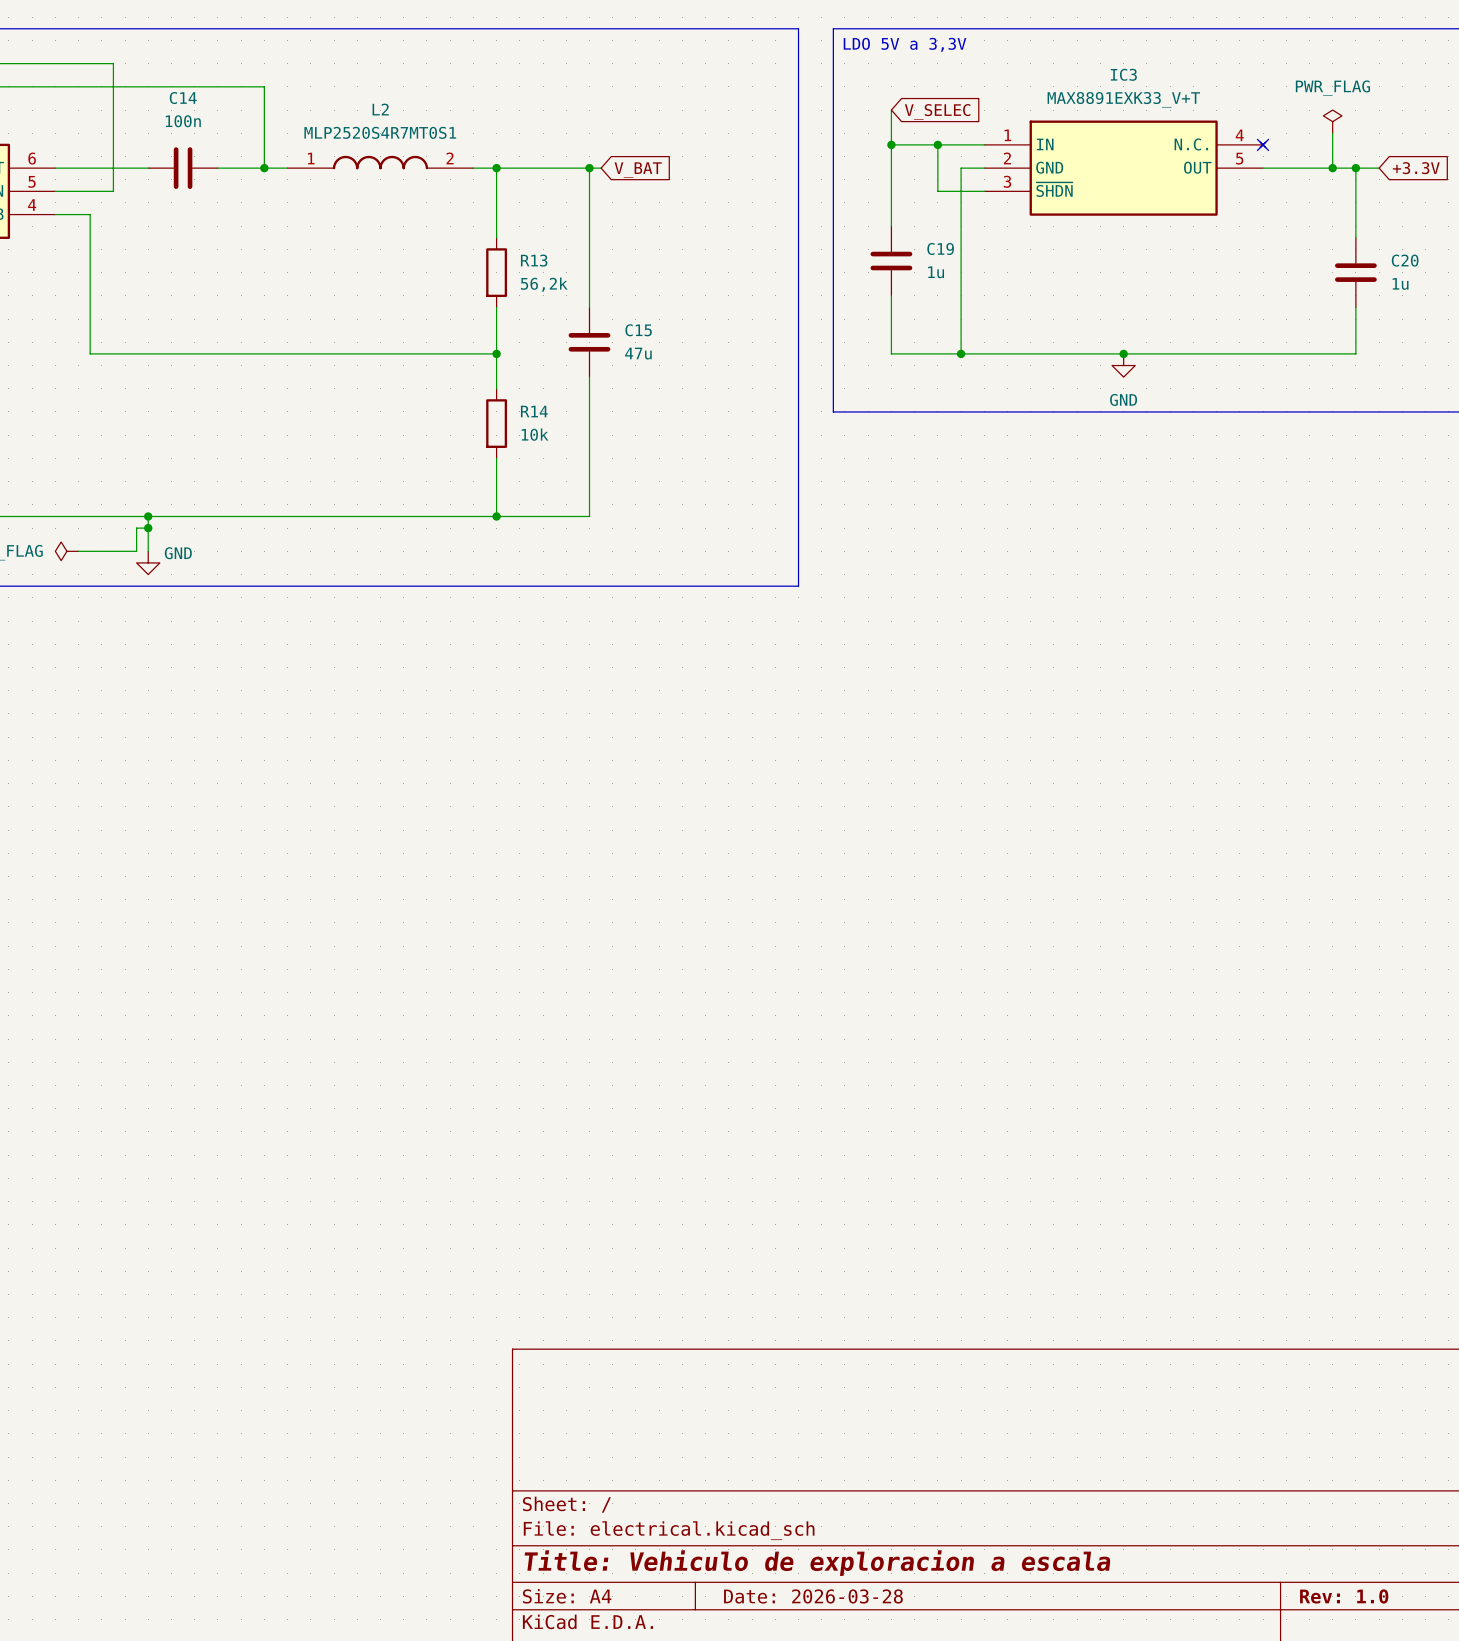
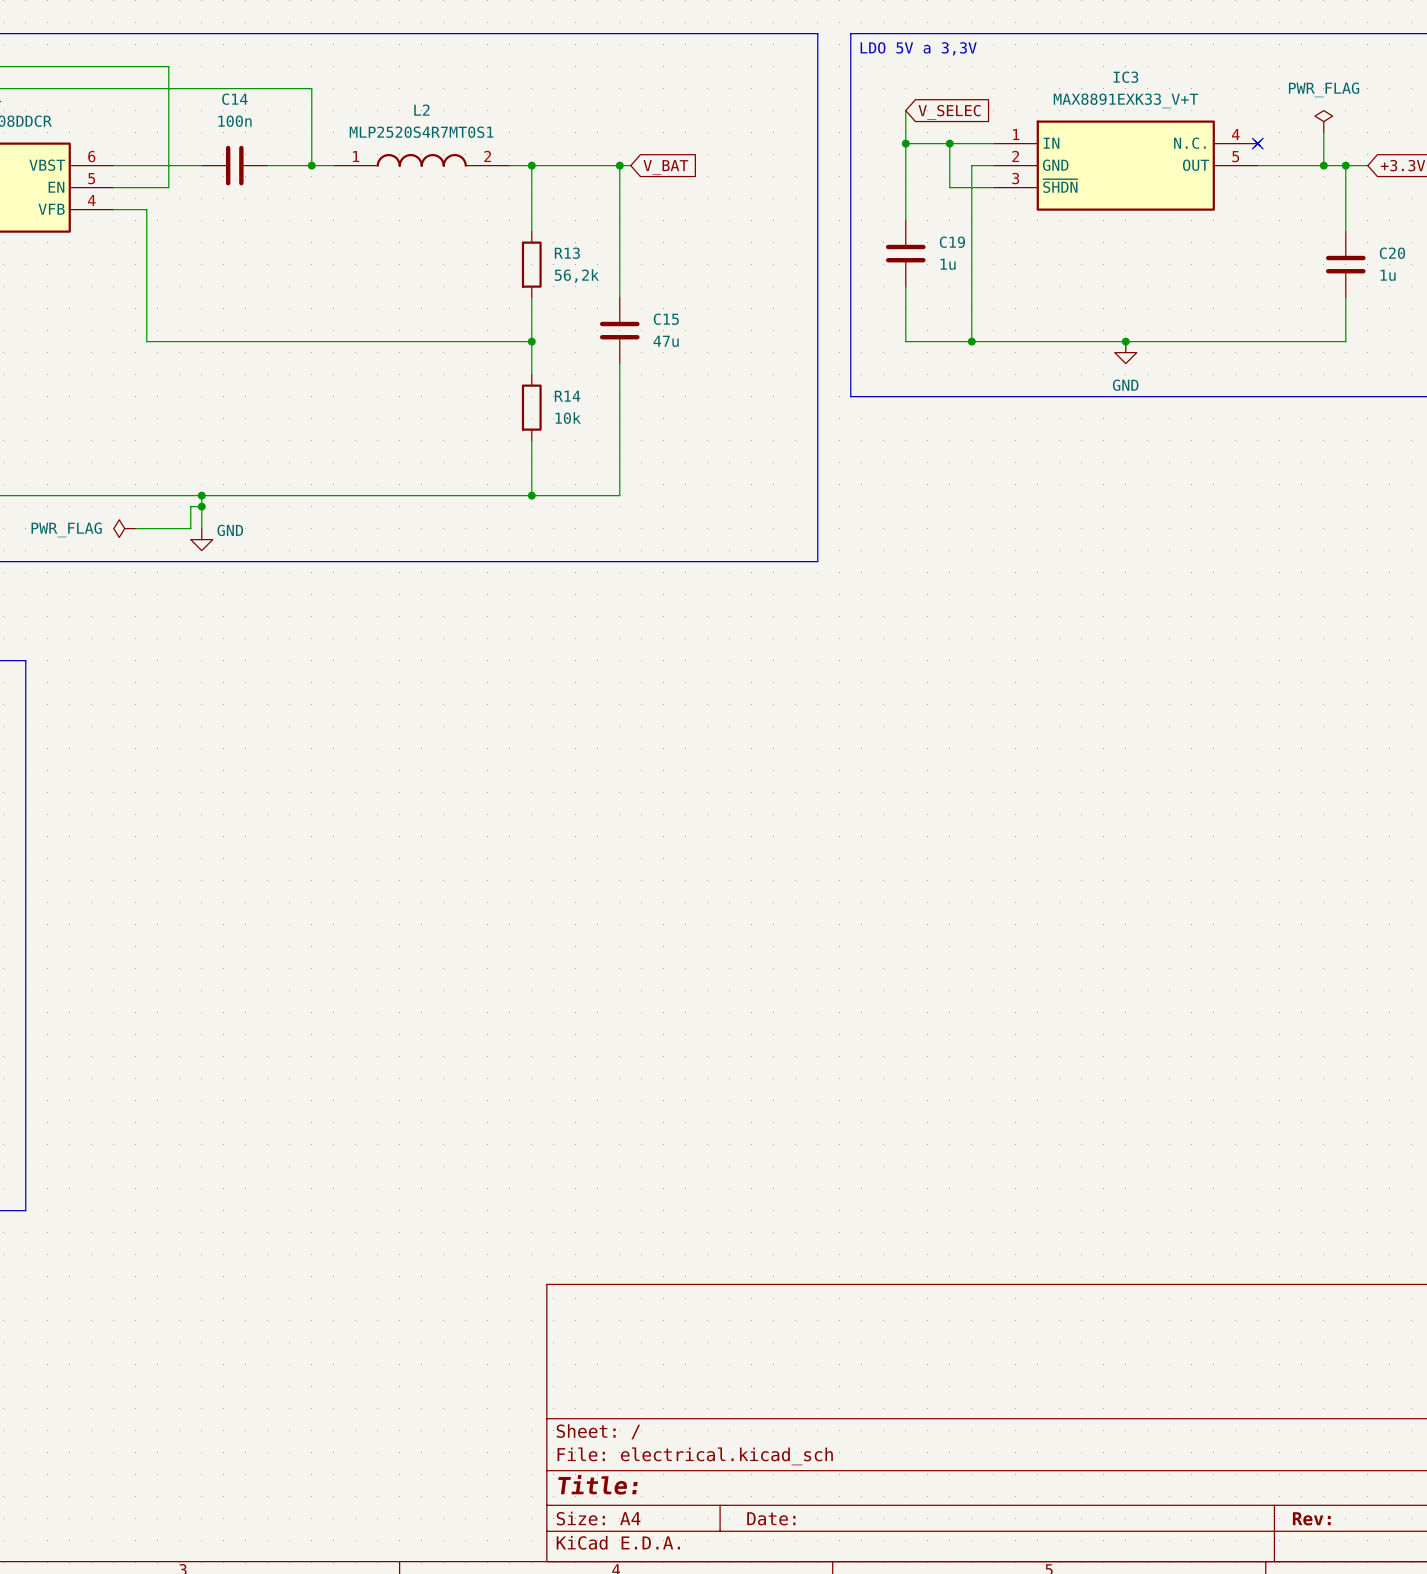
title block: Title: Vehiculo de exploracion a escala (817, 1563) -> Title: (597, 1484)
title block: Date: 2026-03-28 (813, 1596) -> Date: (771, 1518)
title block: Rev: 1.0 (1344, 1596) -> Rev: (1311, 1518)

